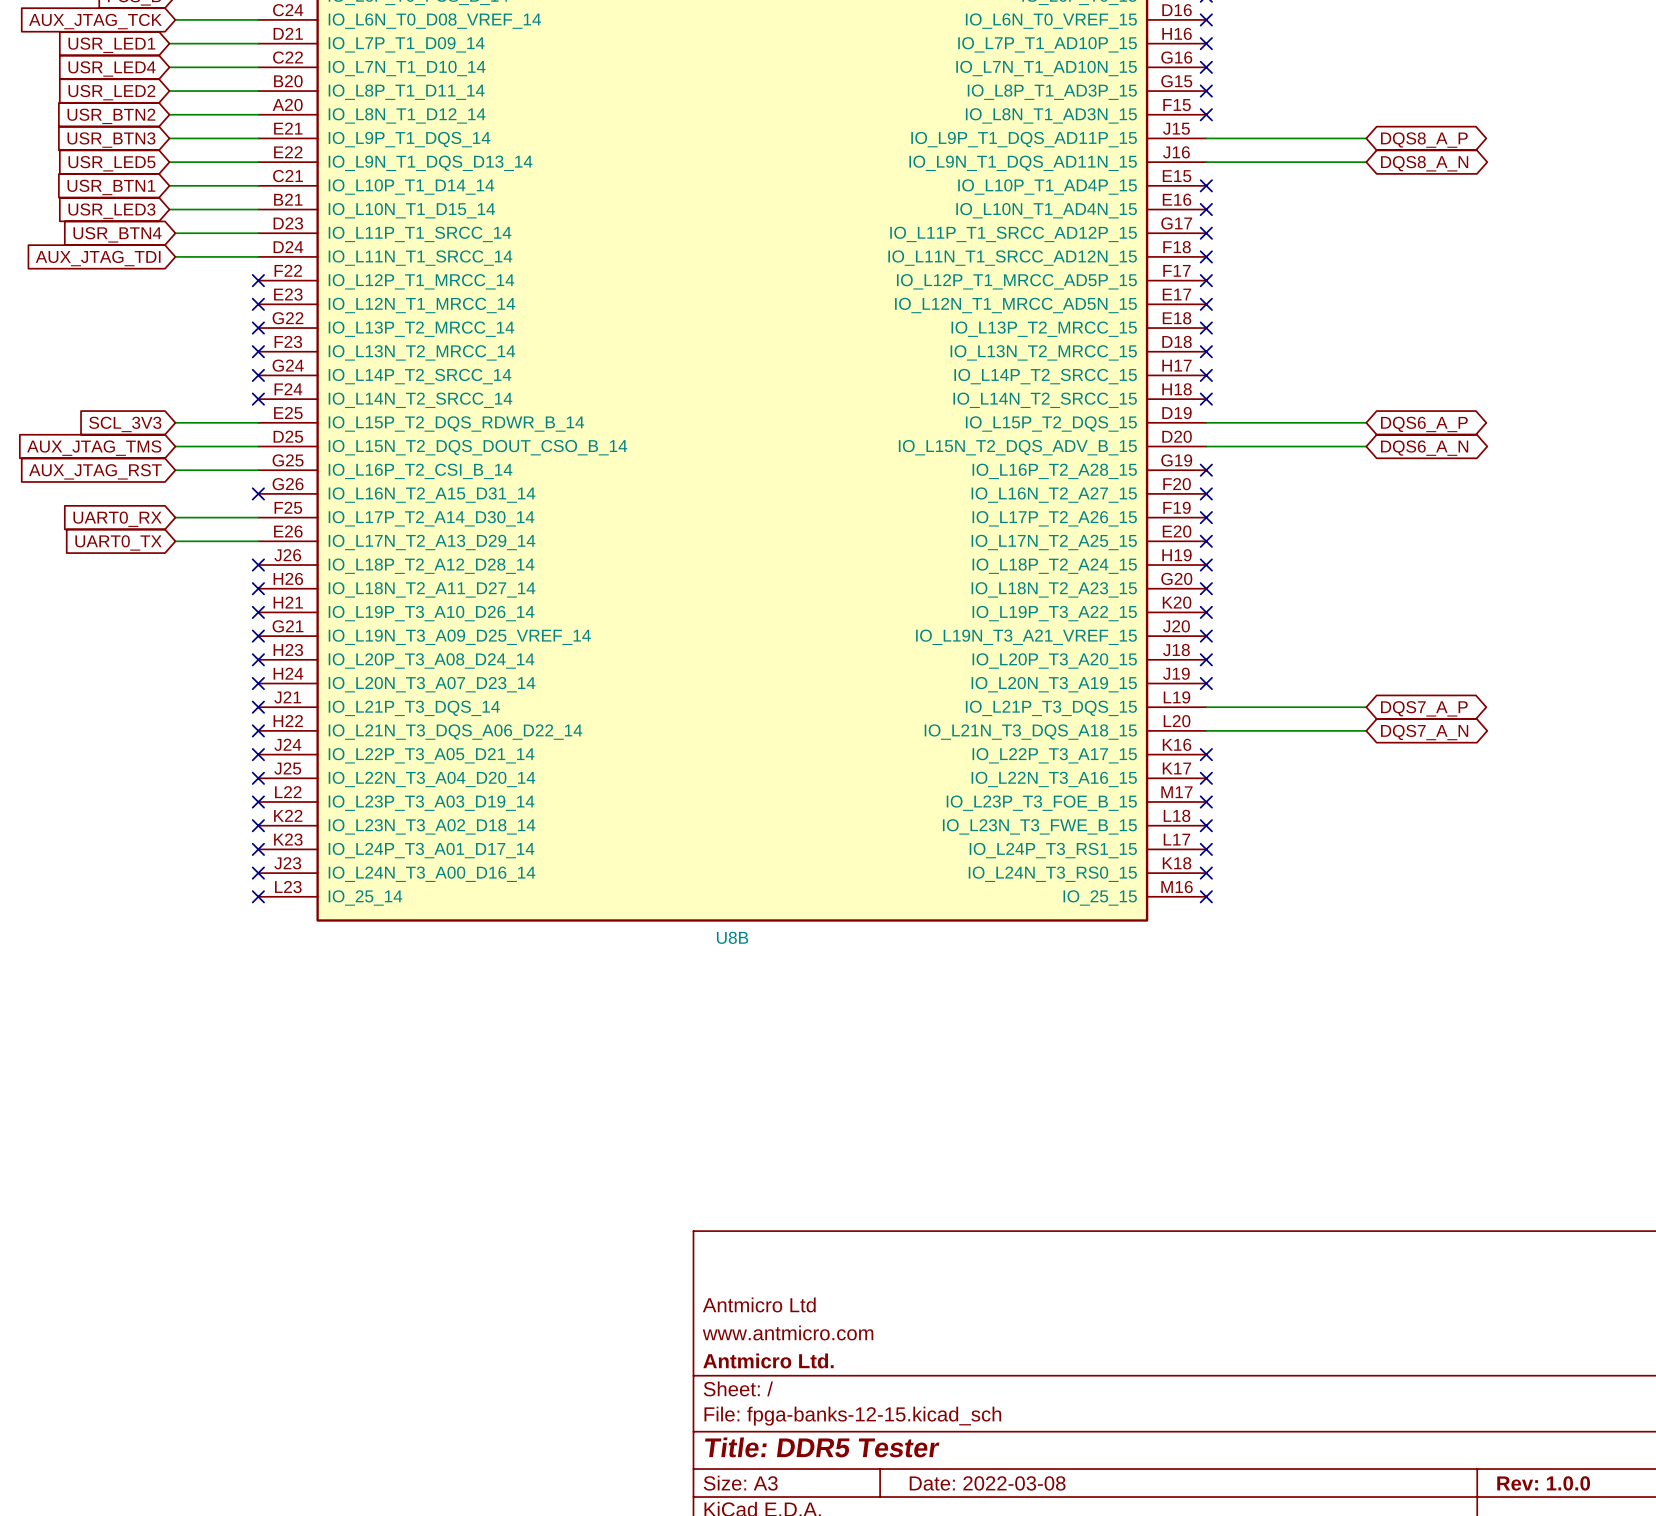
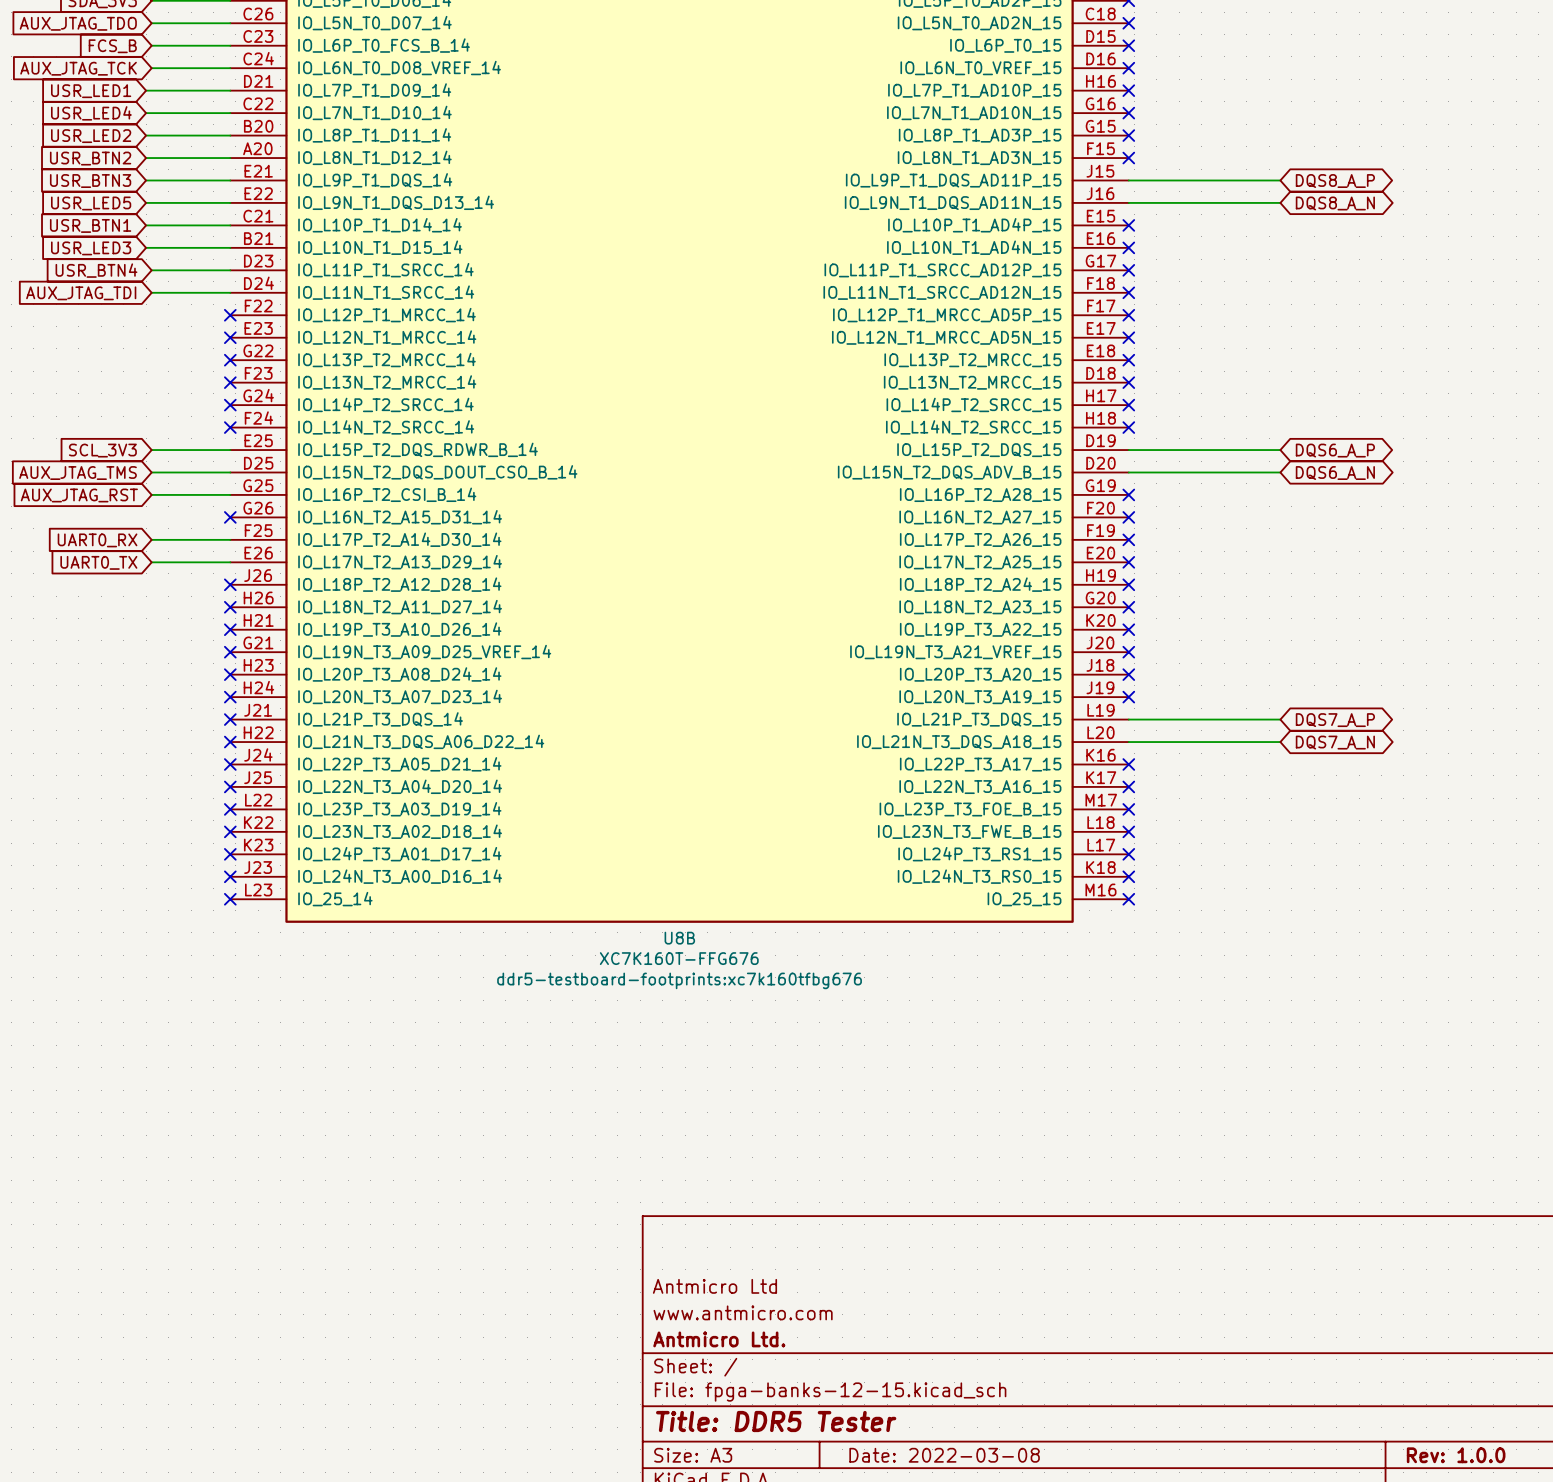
U8B value: none -> XC7K160T-FFG676 (679, 958)
U8B text: none -> ddr5-testboard-footprints:xc7k160tfbg676 (679, 980)

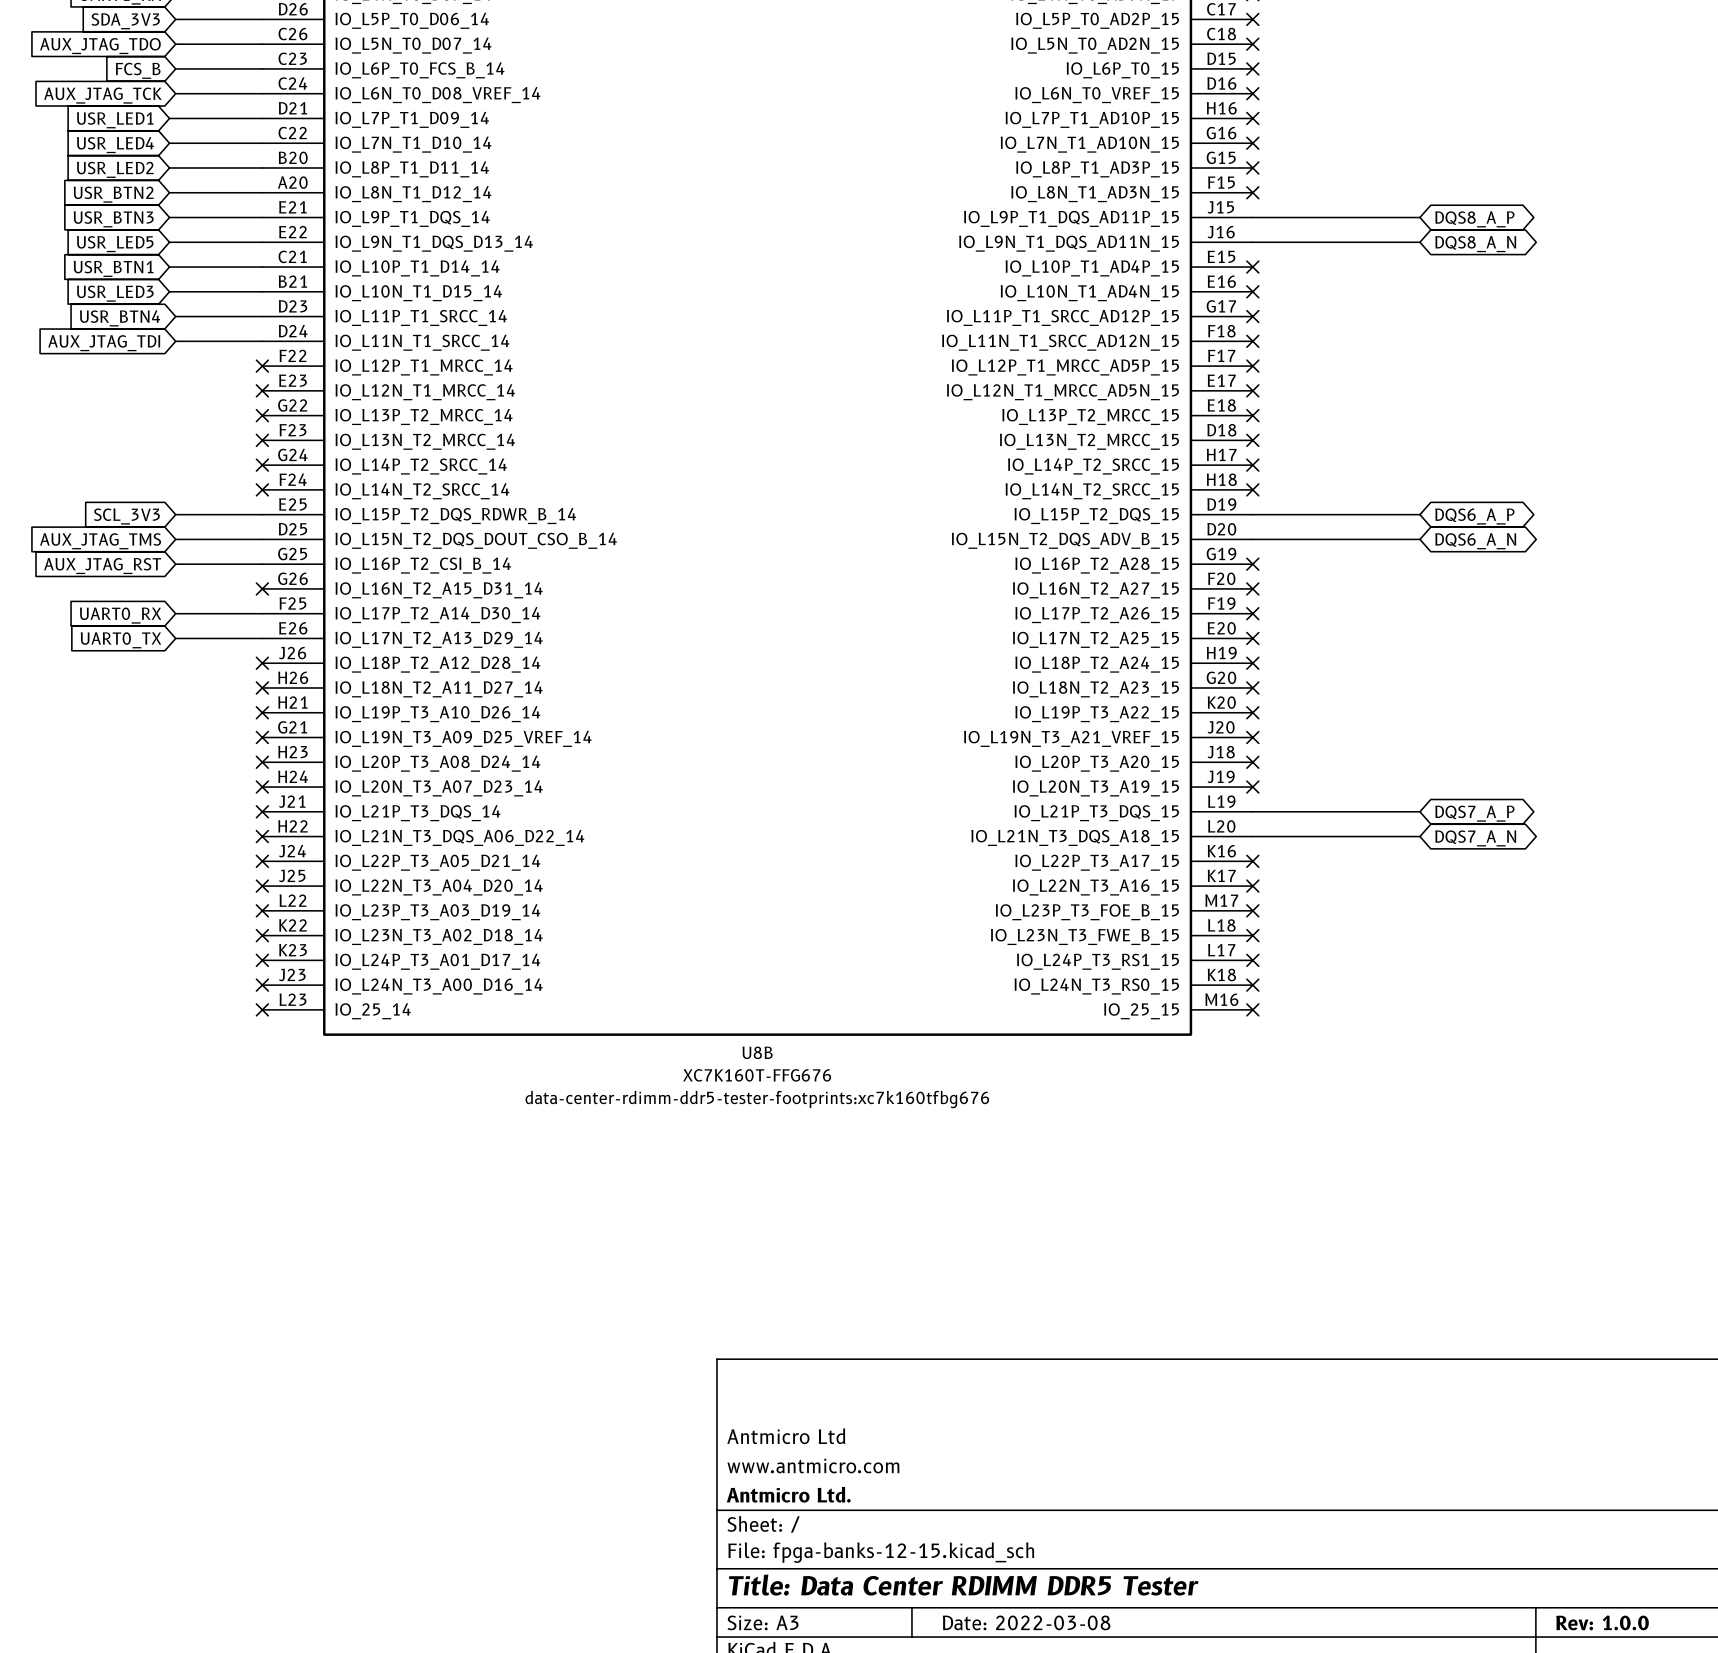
U8B text: ddr5-testboard-footprints:xc7k160tfbg676 (679, 980) -> data-center-rdimm-ddr5-tester-footprints:xc7k160tfbg676 (757, 1099)
title block: Title: DDR5 Tester (776, 1421) -> Title: Data Center RDIMM DDR5 Tester (963, 1585)

